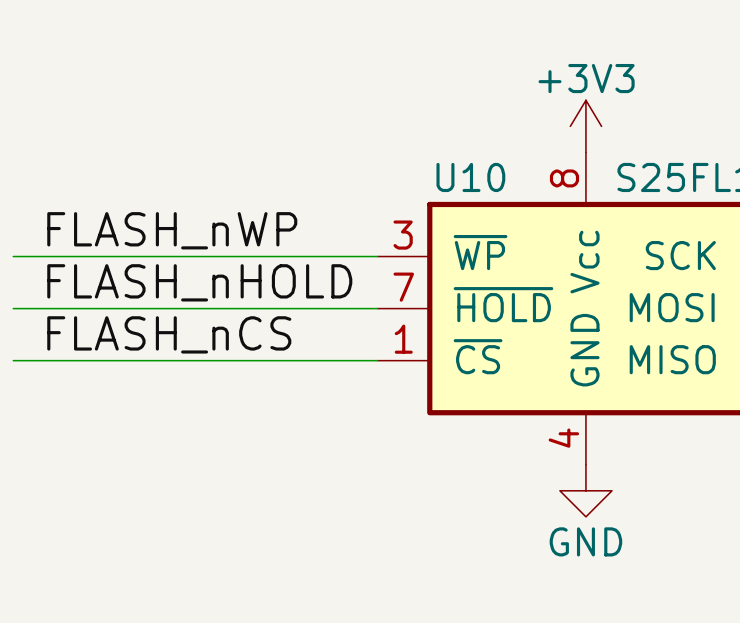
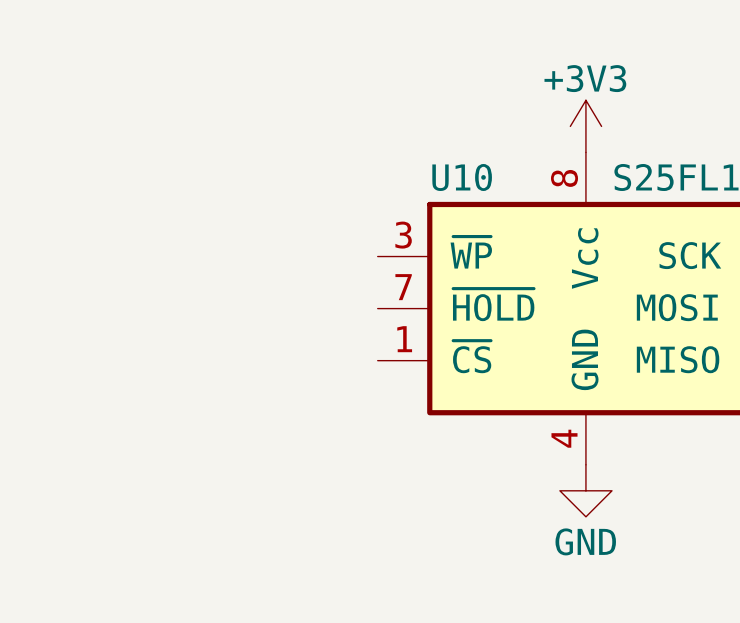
label: FLASH_nWP (172, 230) -> none
wire: (13, 256) (377, 256) -> none
label: FLASH_nHOLD (199, 282) -> none
wire: (13, 308) (377, 308) -> none
label: FLASH_nCS (169, 334) -> none
wire: (13, 360) (377, 360) -> none

